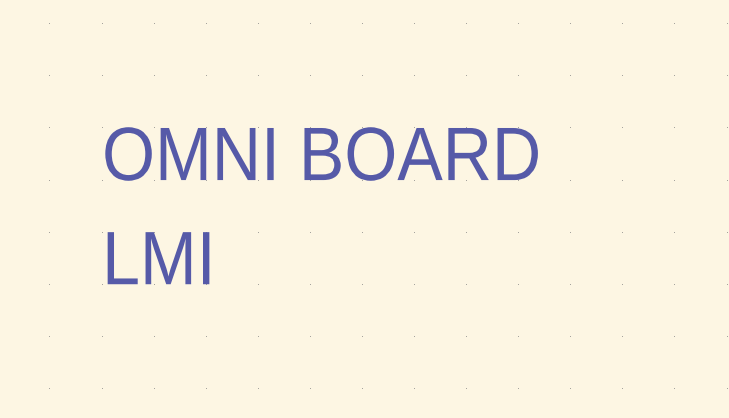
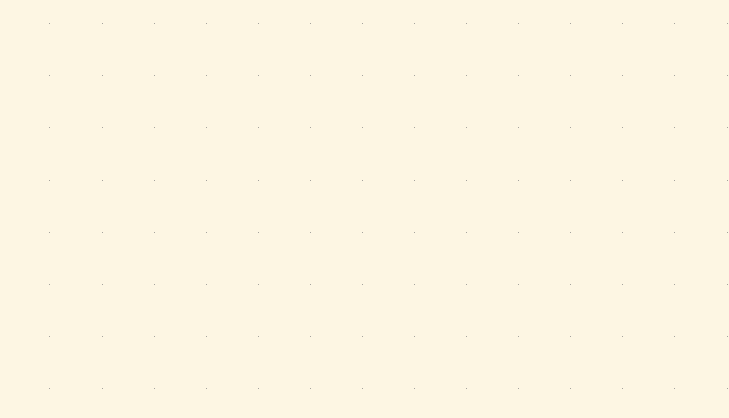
text: OMNI BOARD (321, 154) -> none
text: LMI (158, 258) -> none

